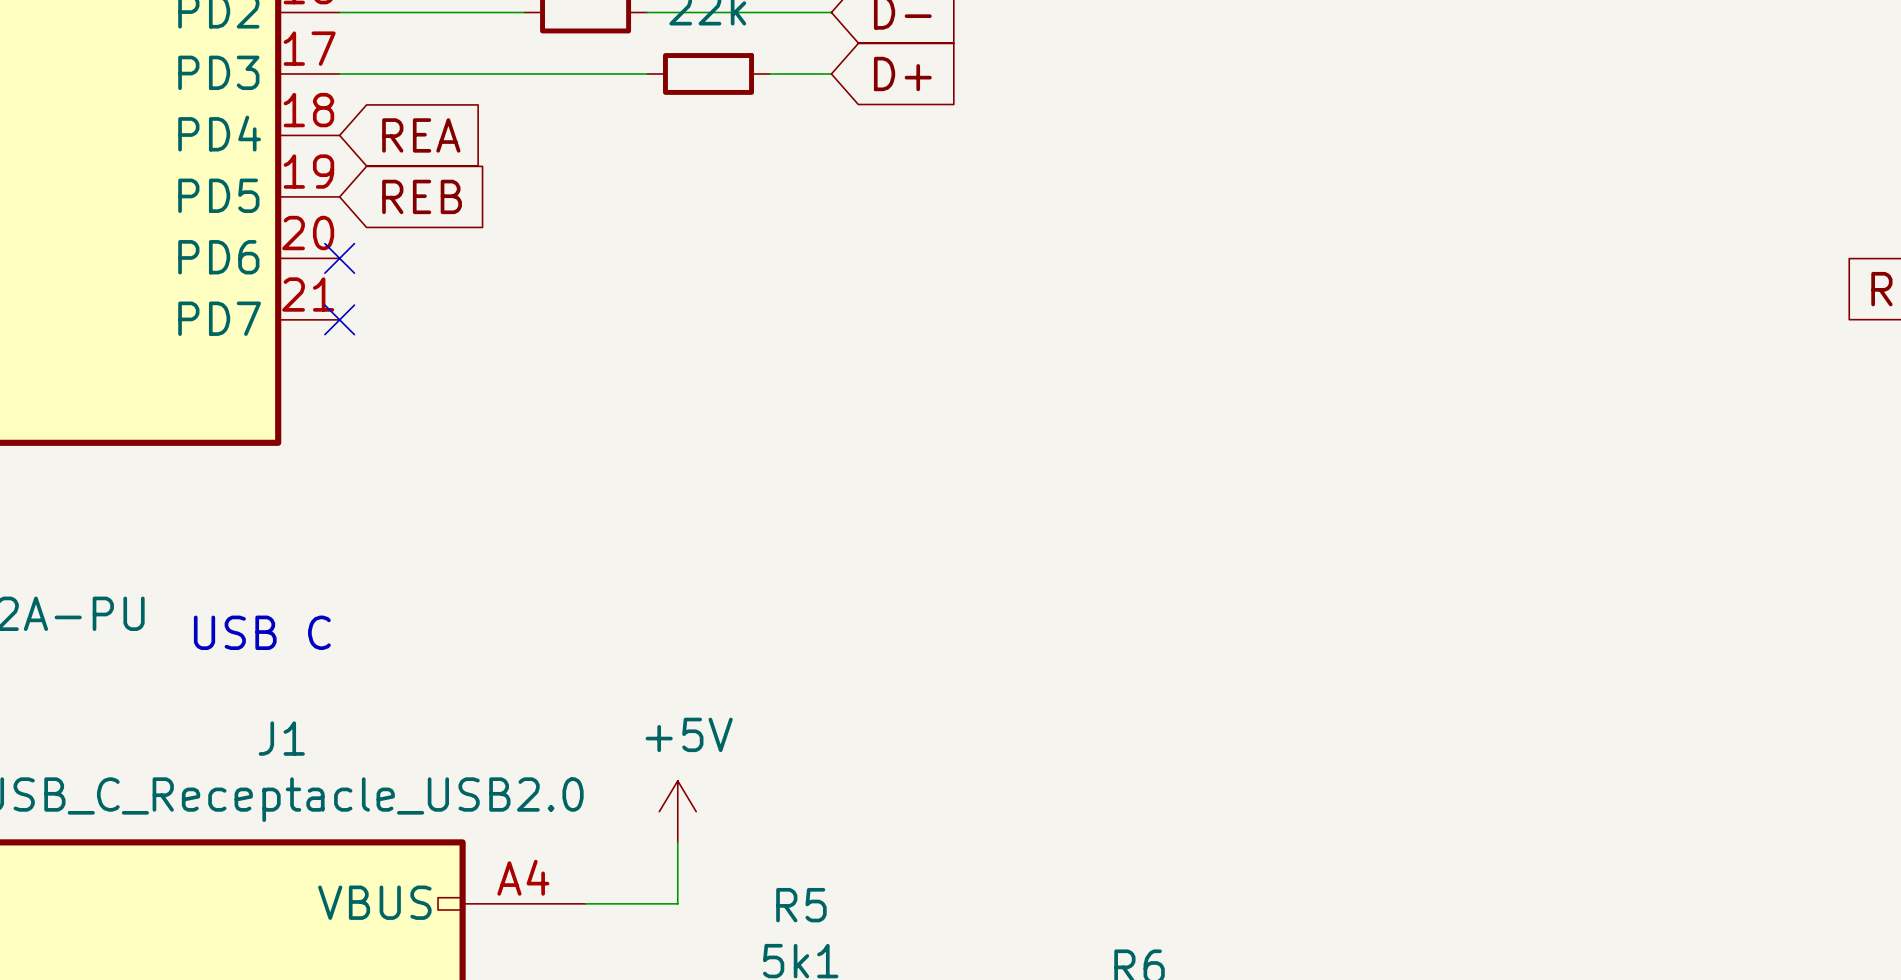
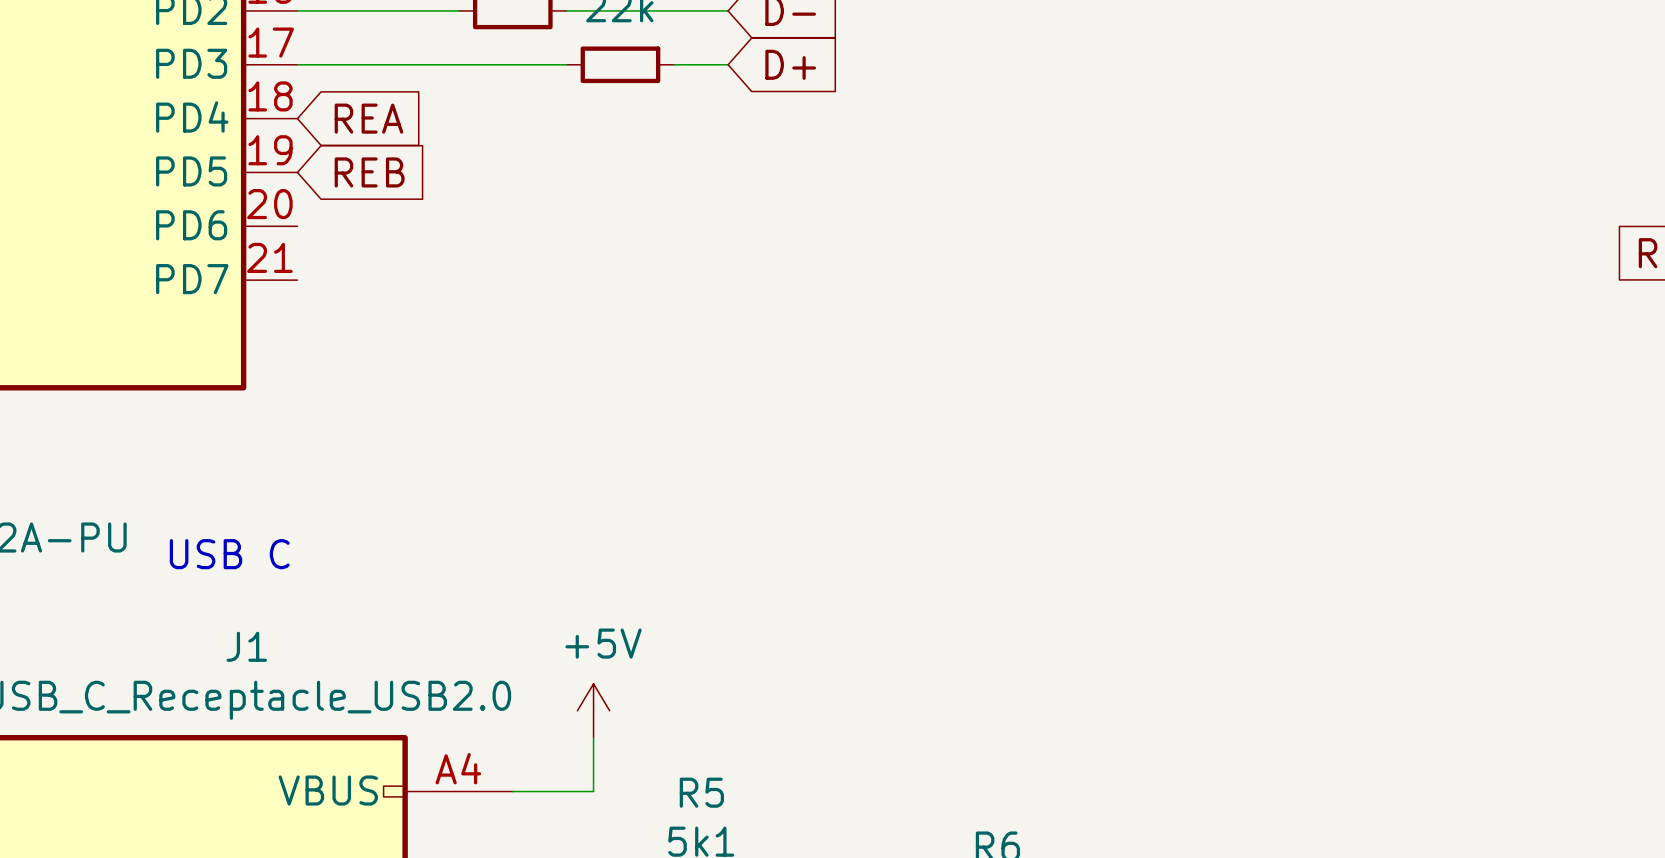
no-connect mark: (339, 258) -> none
no-connect mark: (339, 319) -> none

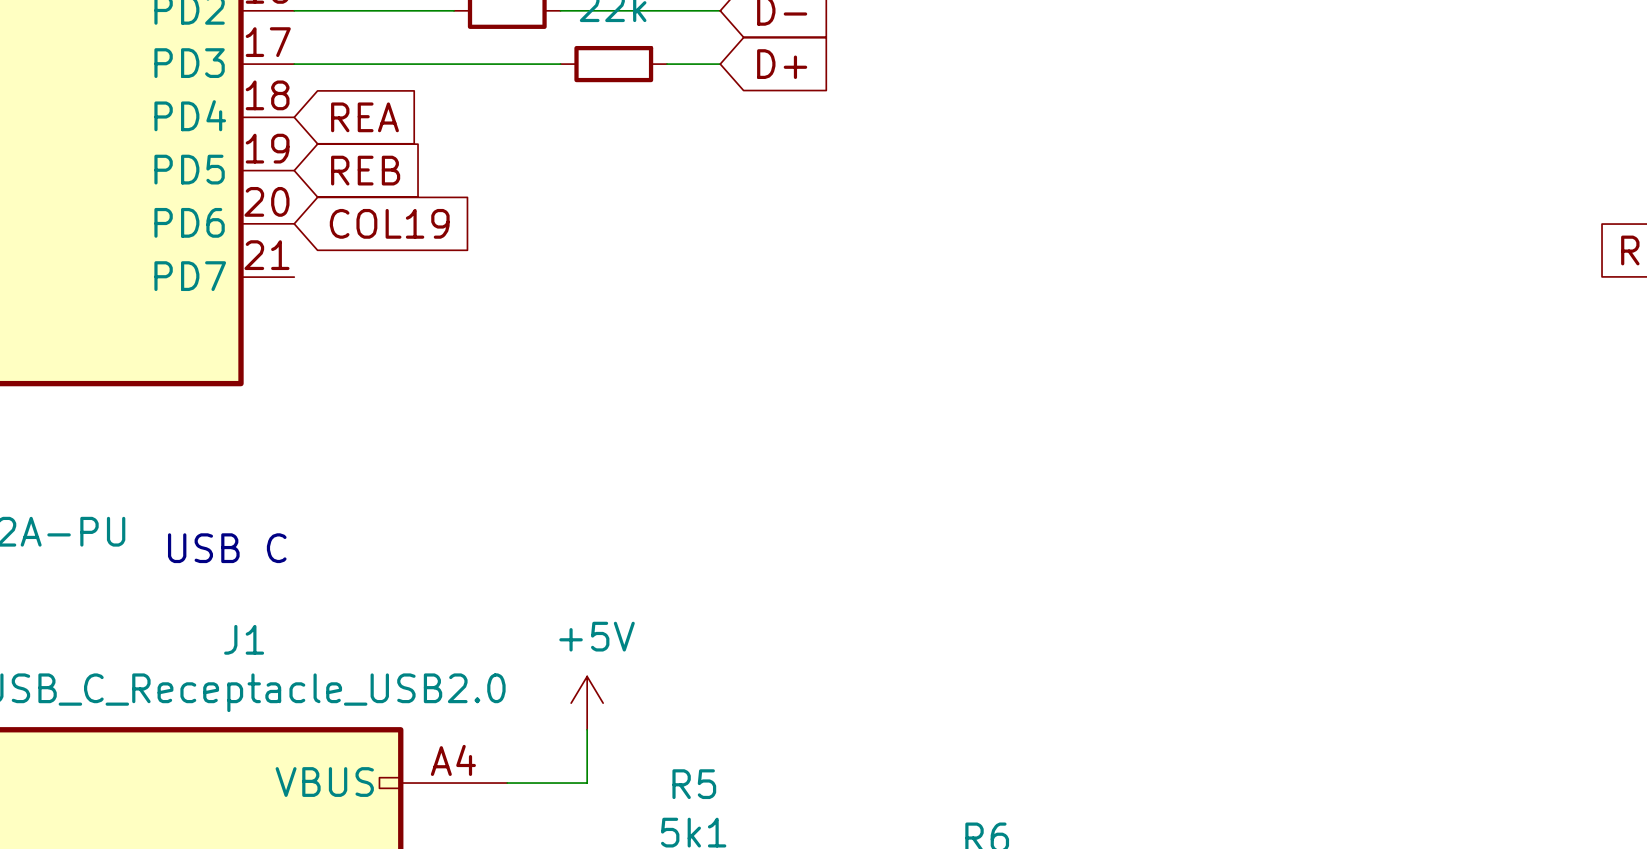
global label: none -> COL19 (389, 223)

